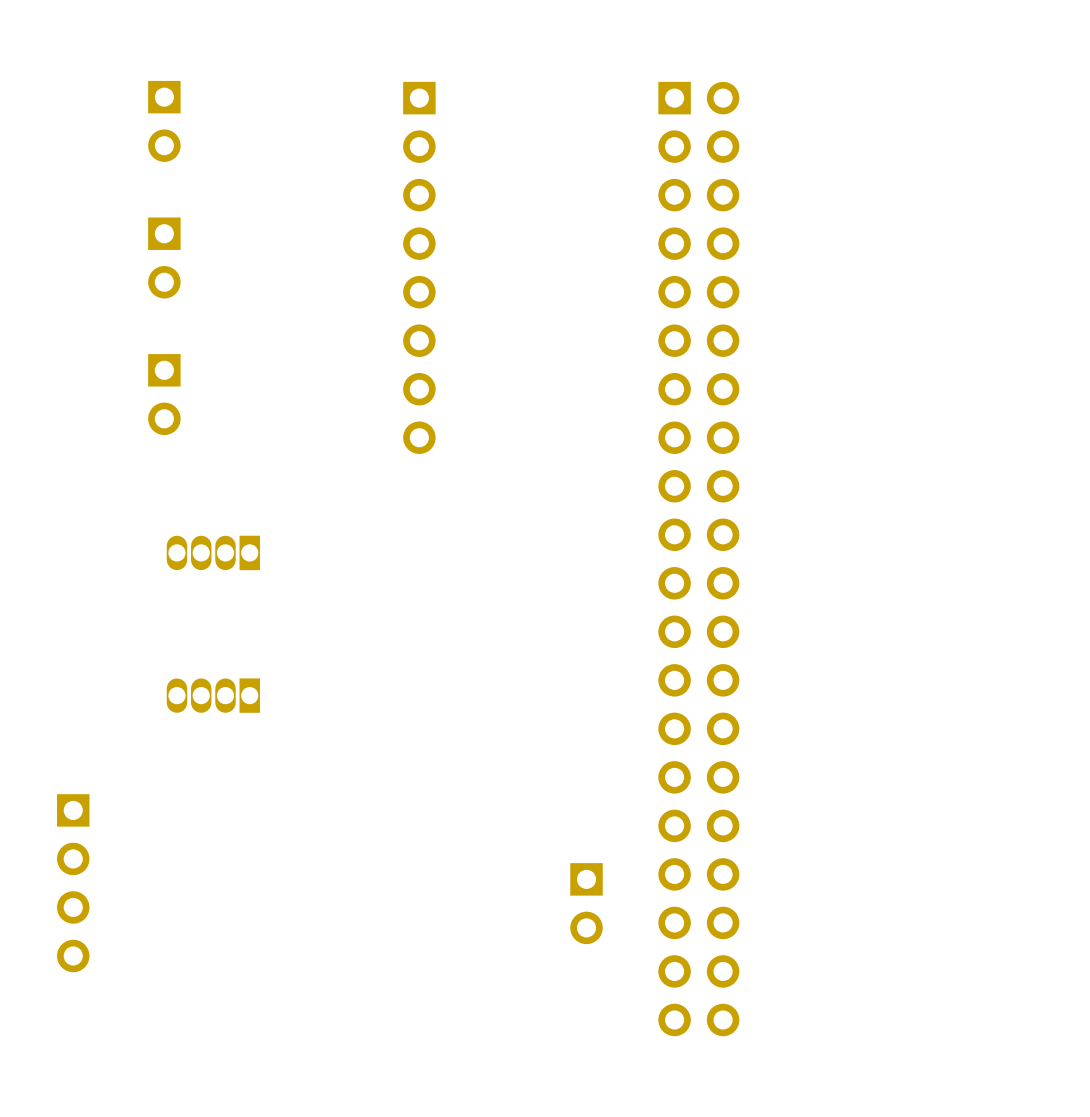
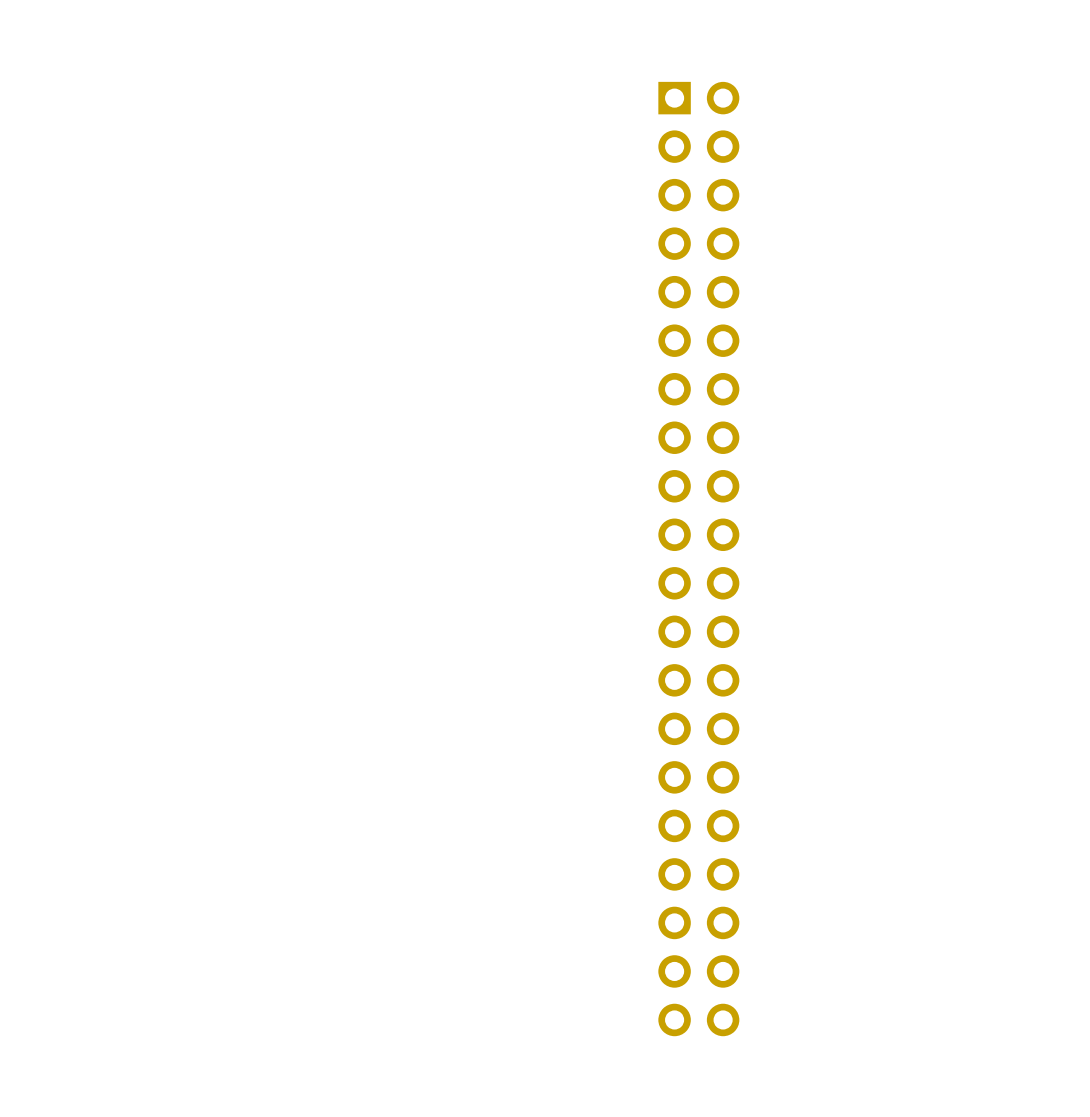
part: (164, 121) -> none
part: (164, 257) -> none
part: (419, 267) -> none
part: (164, 394) -> none
part: (213, 552) -> none
part: (213, 695) -> none
part: (73, 883) -> none
part: (586, 903) -> none

